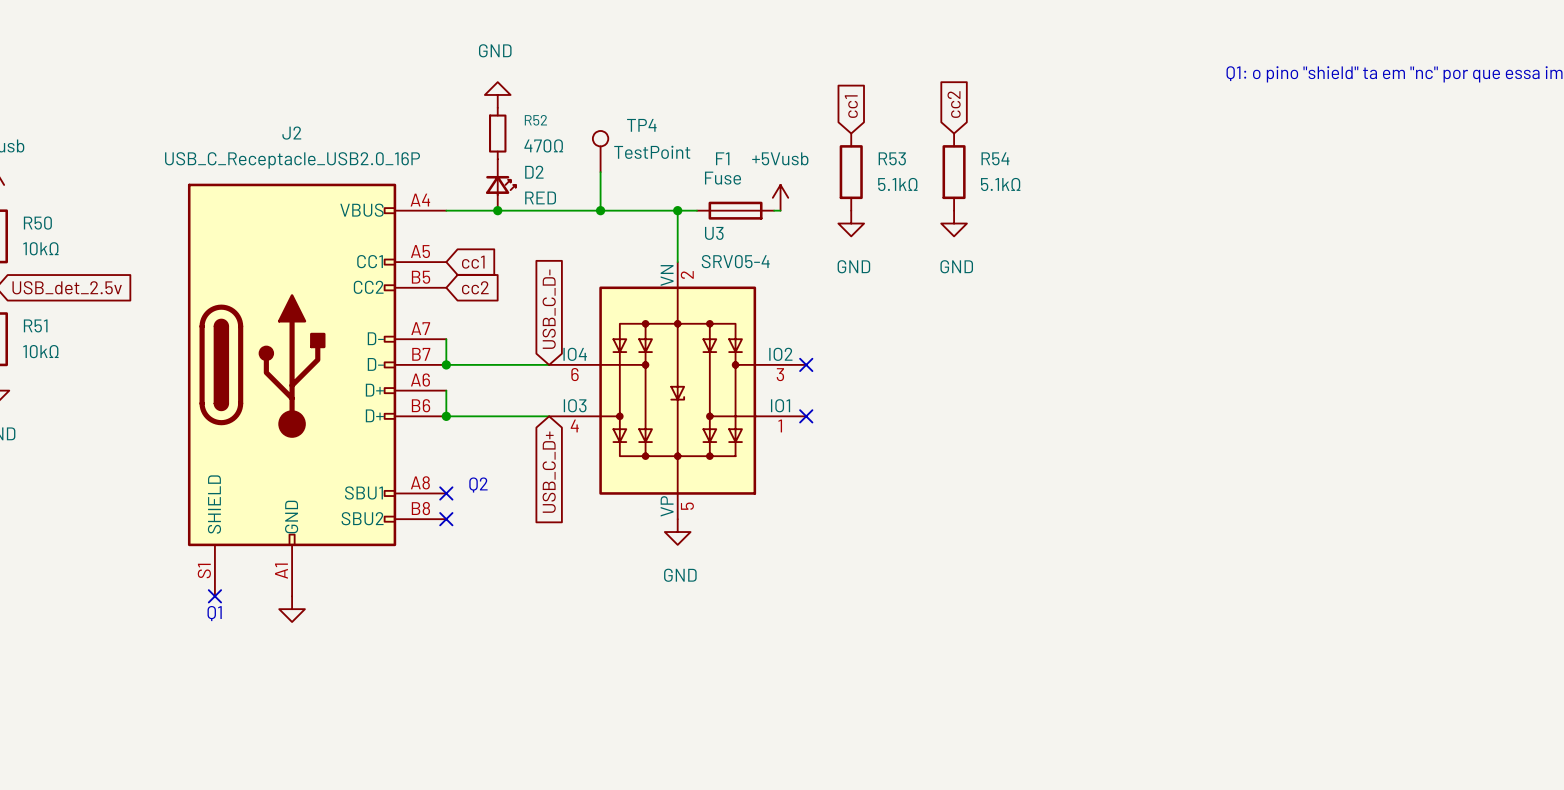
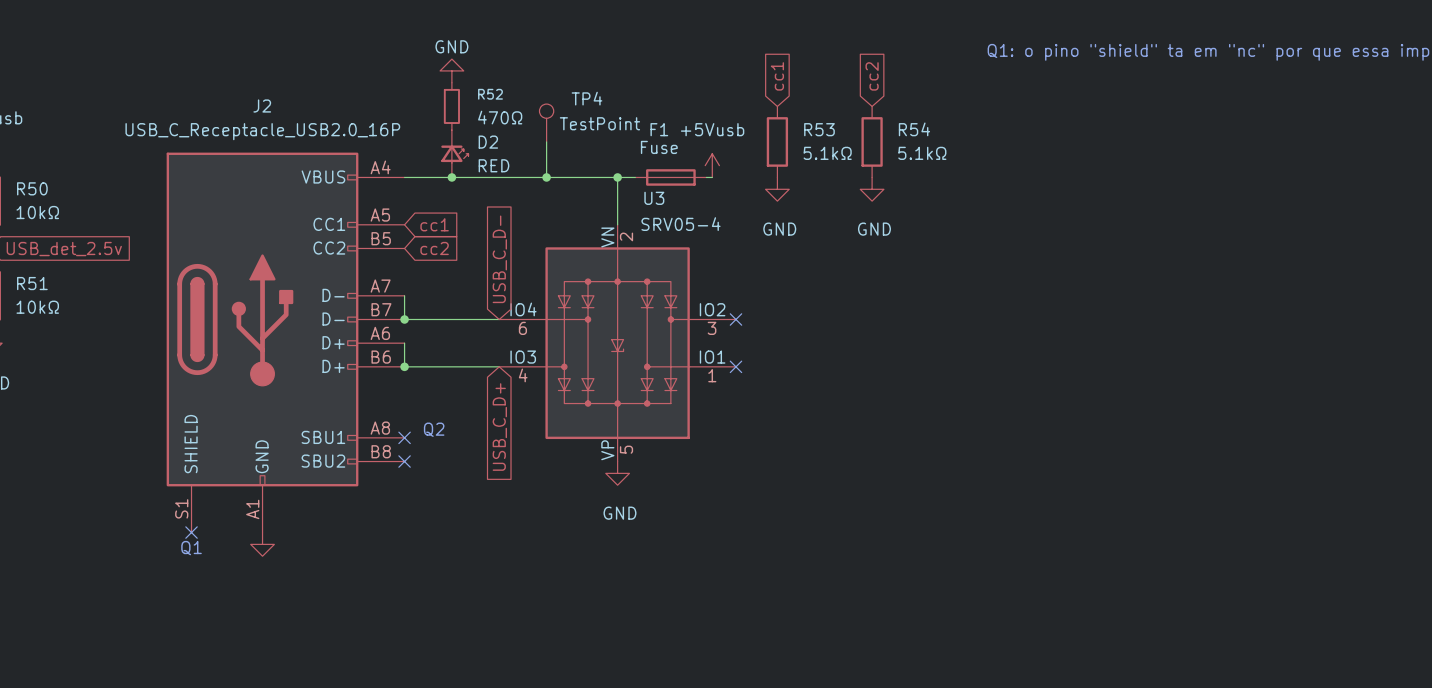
power symbol text position: GND (495, 50) -> GND (451, 46)

